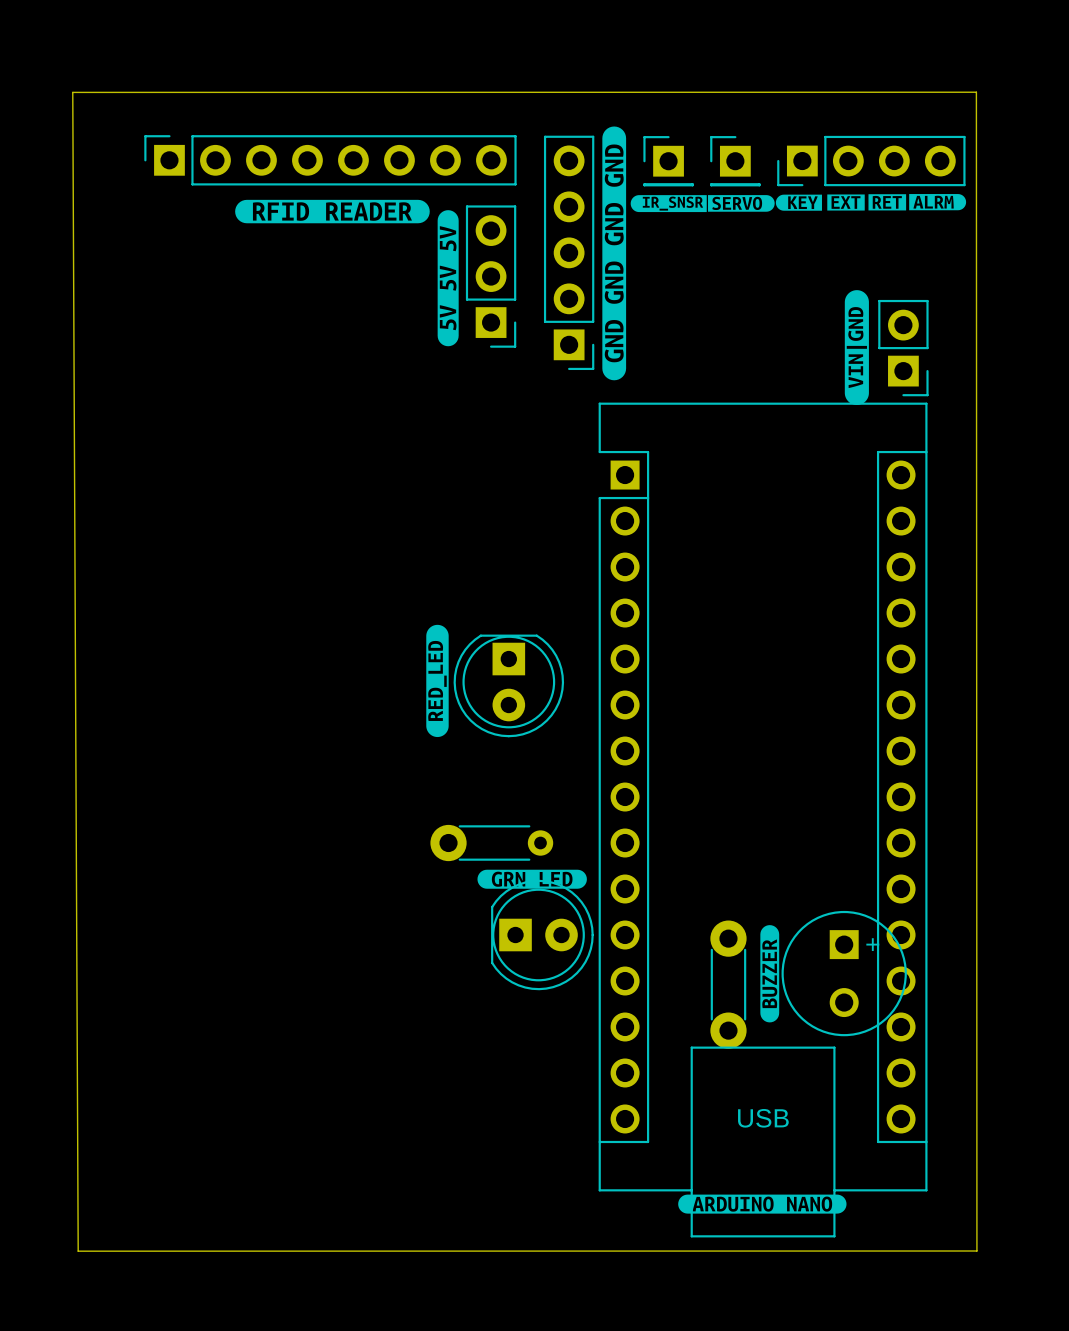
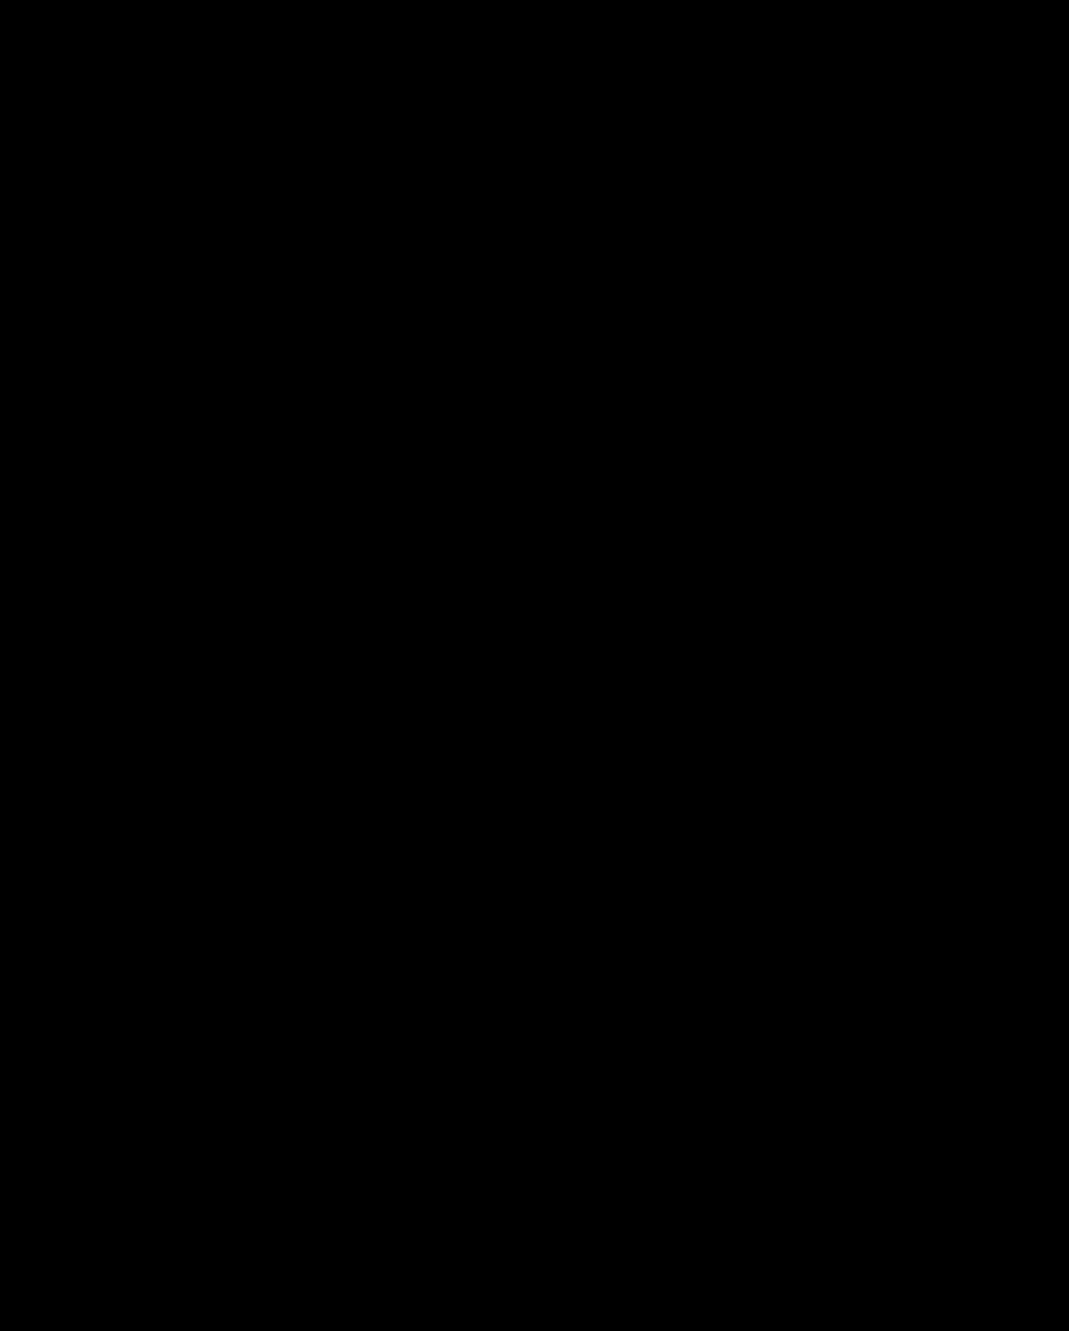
board edge: (976, 92) (72, 92) (78, 1251) (976, 1251) (976, 92) -> none
drawing: [602, 126, 967, 381] -> none
part: (330, 160) -> none
part: (668, 161) -> none
part: (735, 161) -> none
part: (871, 161) -> none
drawing: [235, 199, 459, 347] -> none
part: (569, 252) -> none
part: (491, 276) -> none
drawing: [844, 290, 869, 405] -> none
part: (903, 348) -> none
drawing: [426, 624, 449, 738] -> none
part: (508, 685) -> none
part: (763, 820) -> none
part: (491, 843) -> none
drawing: [477, 869, 587, 889] -> none
drawing: [760, 925, 780, 1023] -> none
part: (542, 935) -> none
part: (844, 973) -> none
part: (728, 984) -> none
drawing: [678, 1194, 847, 1214] -> none

